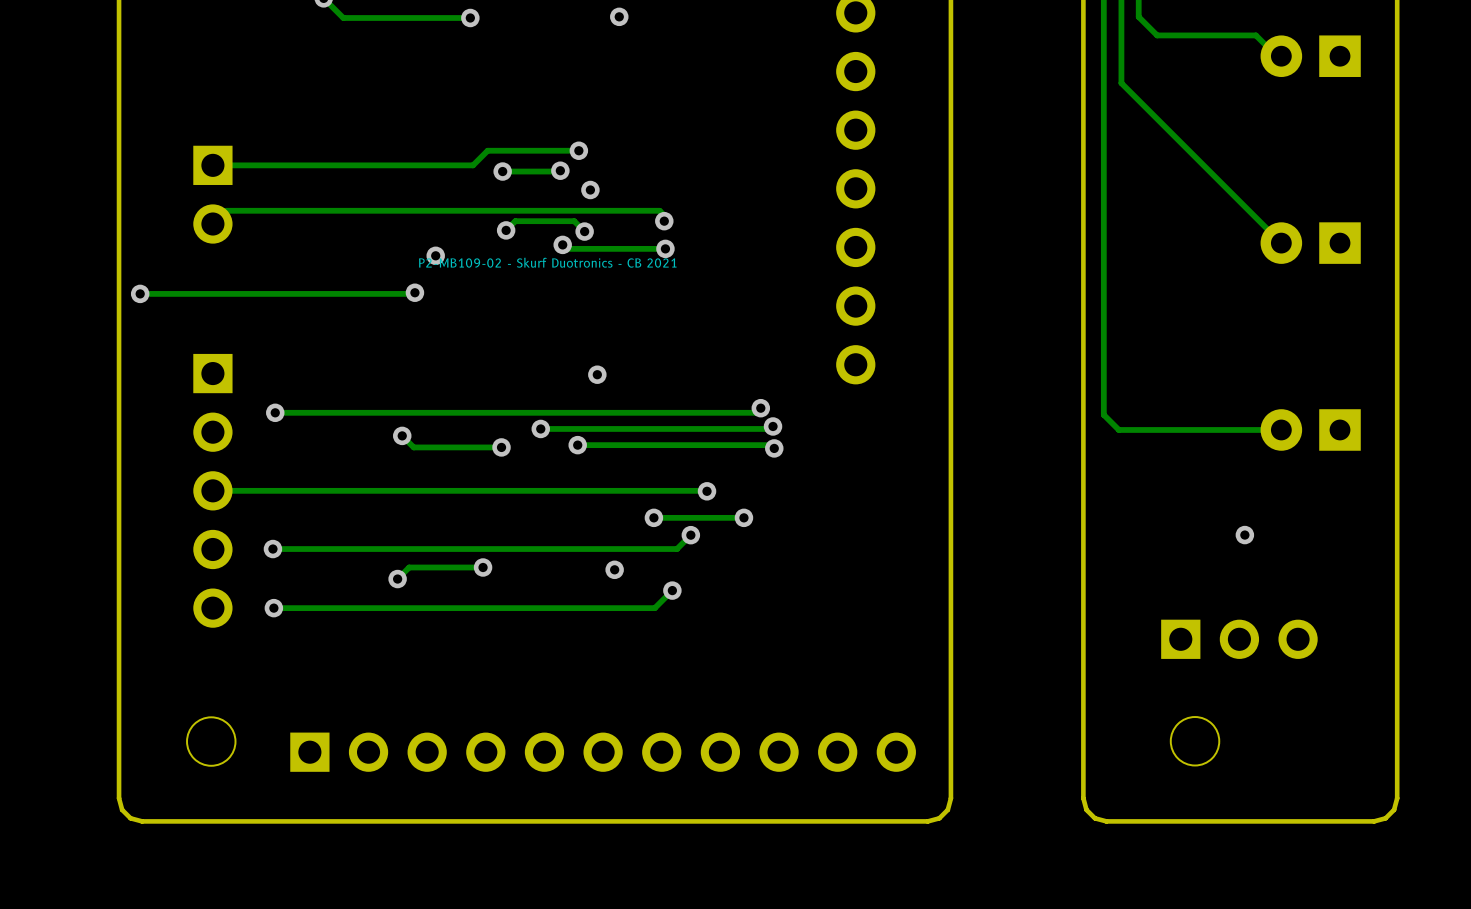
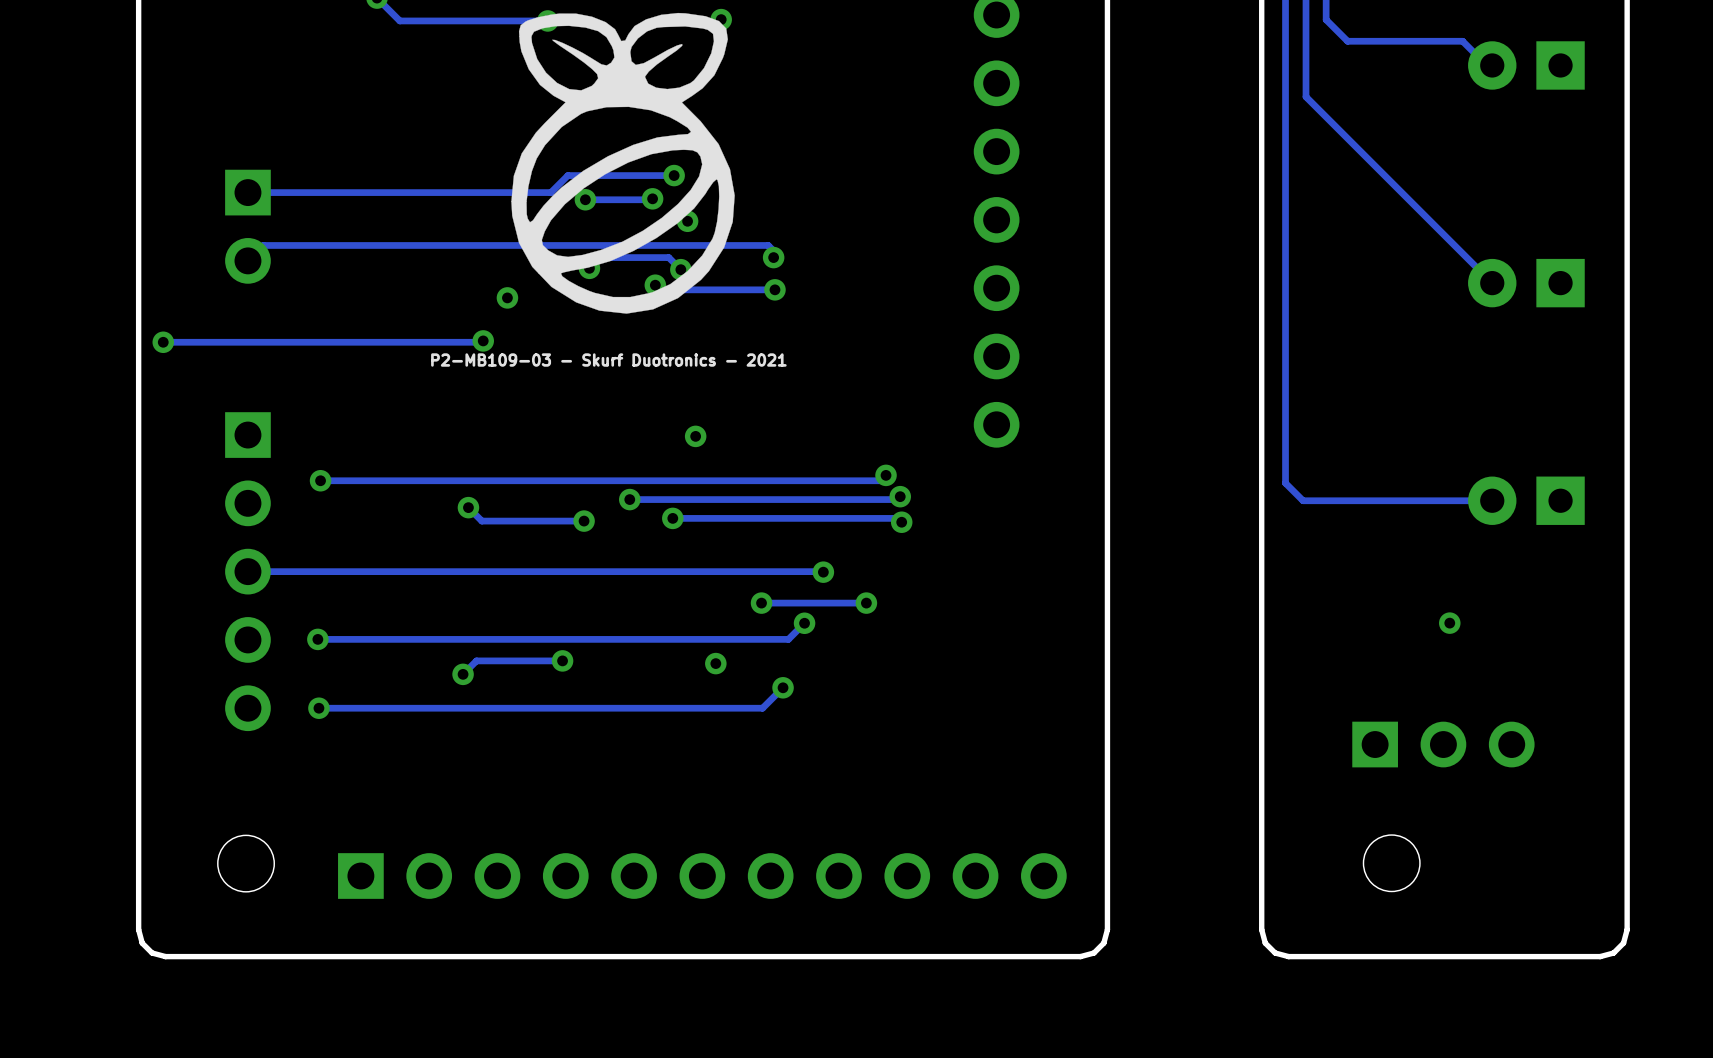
drawing: none -> [511, 12, 735, 314]
text: P2-MB109-02 - Skurf Duotronics - CB 2021 (547, 262) -> none
text: none -> P2-MB109-03 - Skurf Duotronics - 2021 (608, 360)

